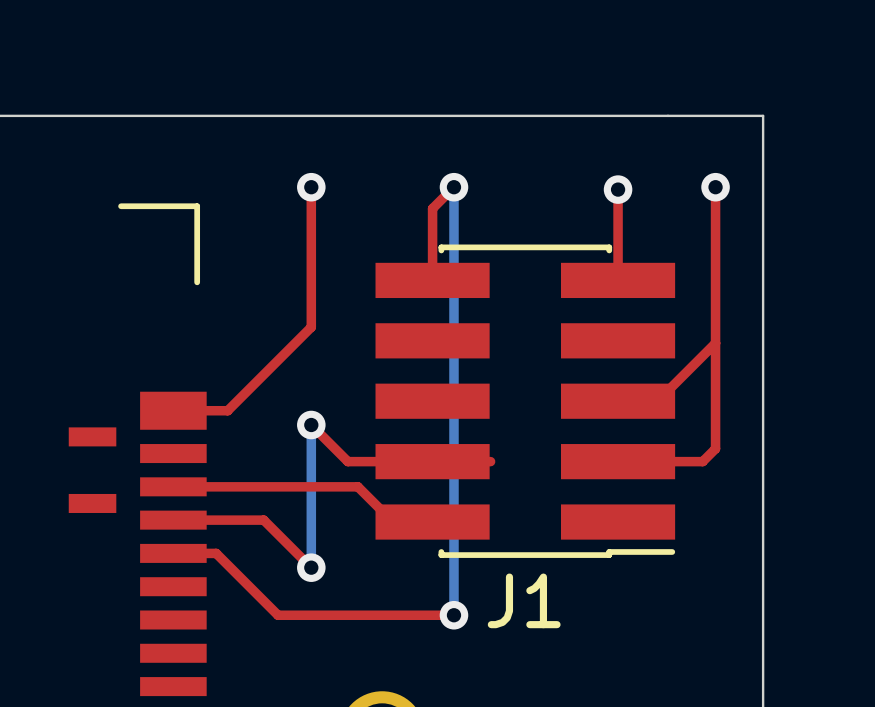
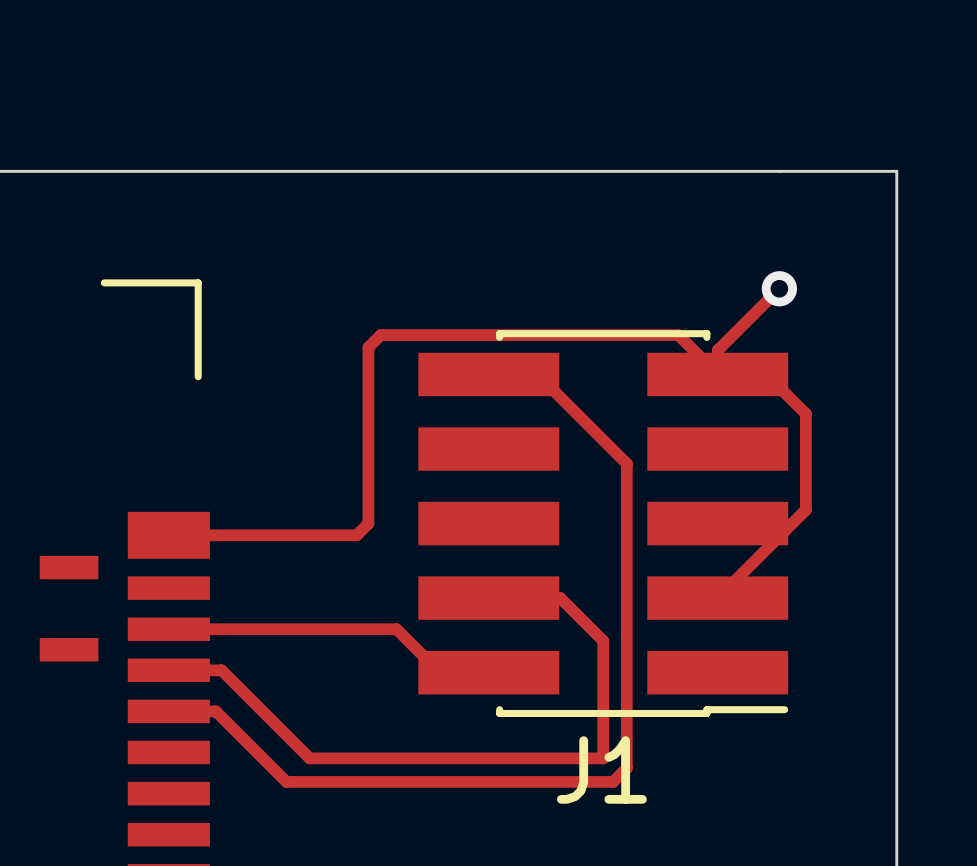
top track: (311, 187) (311, 327) (227, 410) -> (717, 374) (678, 335) (380, 335) (368, 347) (368, 523) (356, 535) (235, 535)
via: (311, 187) -> none
top track: (453, 187) (432, 208) (432, 280) -> none
bottom track: (453, 187) (453, 615) -> none
via: (453, 187) -> none
top track: (620, 187) (618, 189) (618, 260) -> (779, 288) (717, 350)
top track: (715, 187) (715, 448) (702, 461) (618, 461) -> (766, 374) (805, 413) (805, 510) (717, 598)
via: (715, 187) -> none
via: (618, 189) -> none
via: none -> (779, 288)
top track: (715, 343) (657, 401) (618, 401) -> none
top track: (311, 425) (347, 461) (432, 461) -> none
bottom track: (311, 425) (311, 567) -> none
via: (311, 425) -> none
top track: (216, 520) (263, 520) (311, 567) -> (221, 670) (309, 758) (603, 758) (603, 640) (560, 598)
top track: (211, 553) (216, 553) (278, 615) (453, 615) -> (215, 711) (286, 781) (613, 781) (626, 768) (626, 463) (537, 374)
via: (311, 567) -> none
via: (453, 615) -> none

